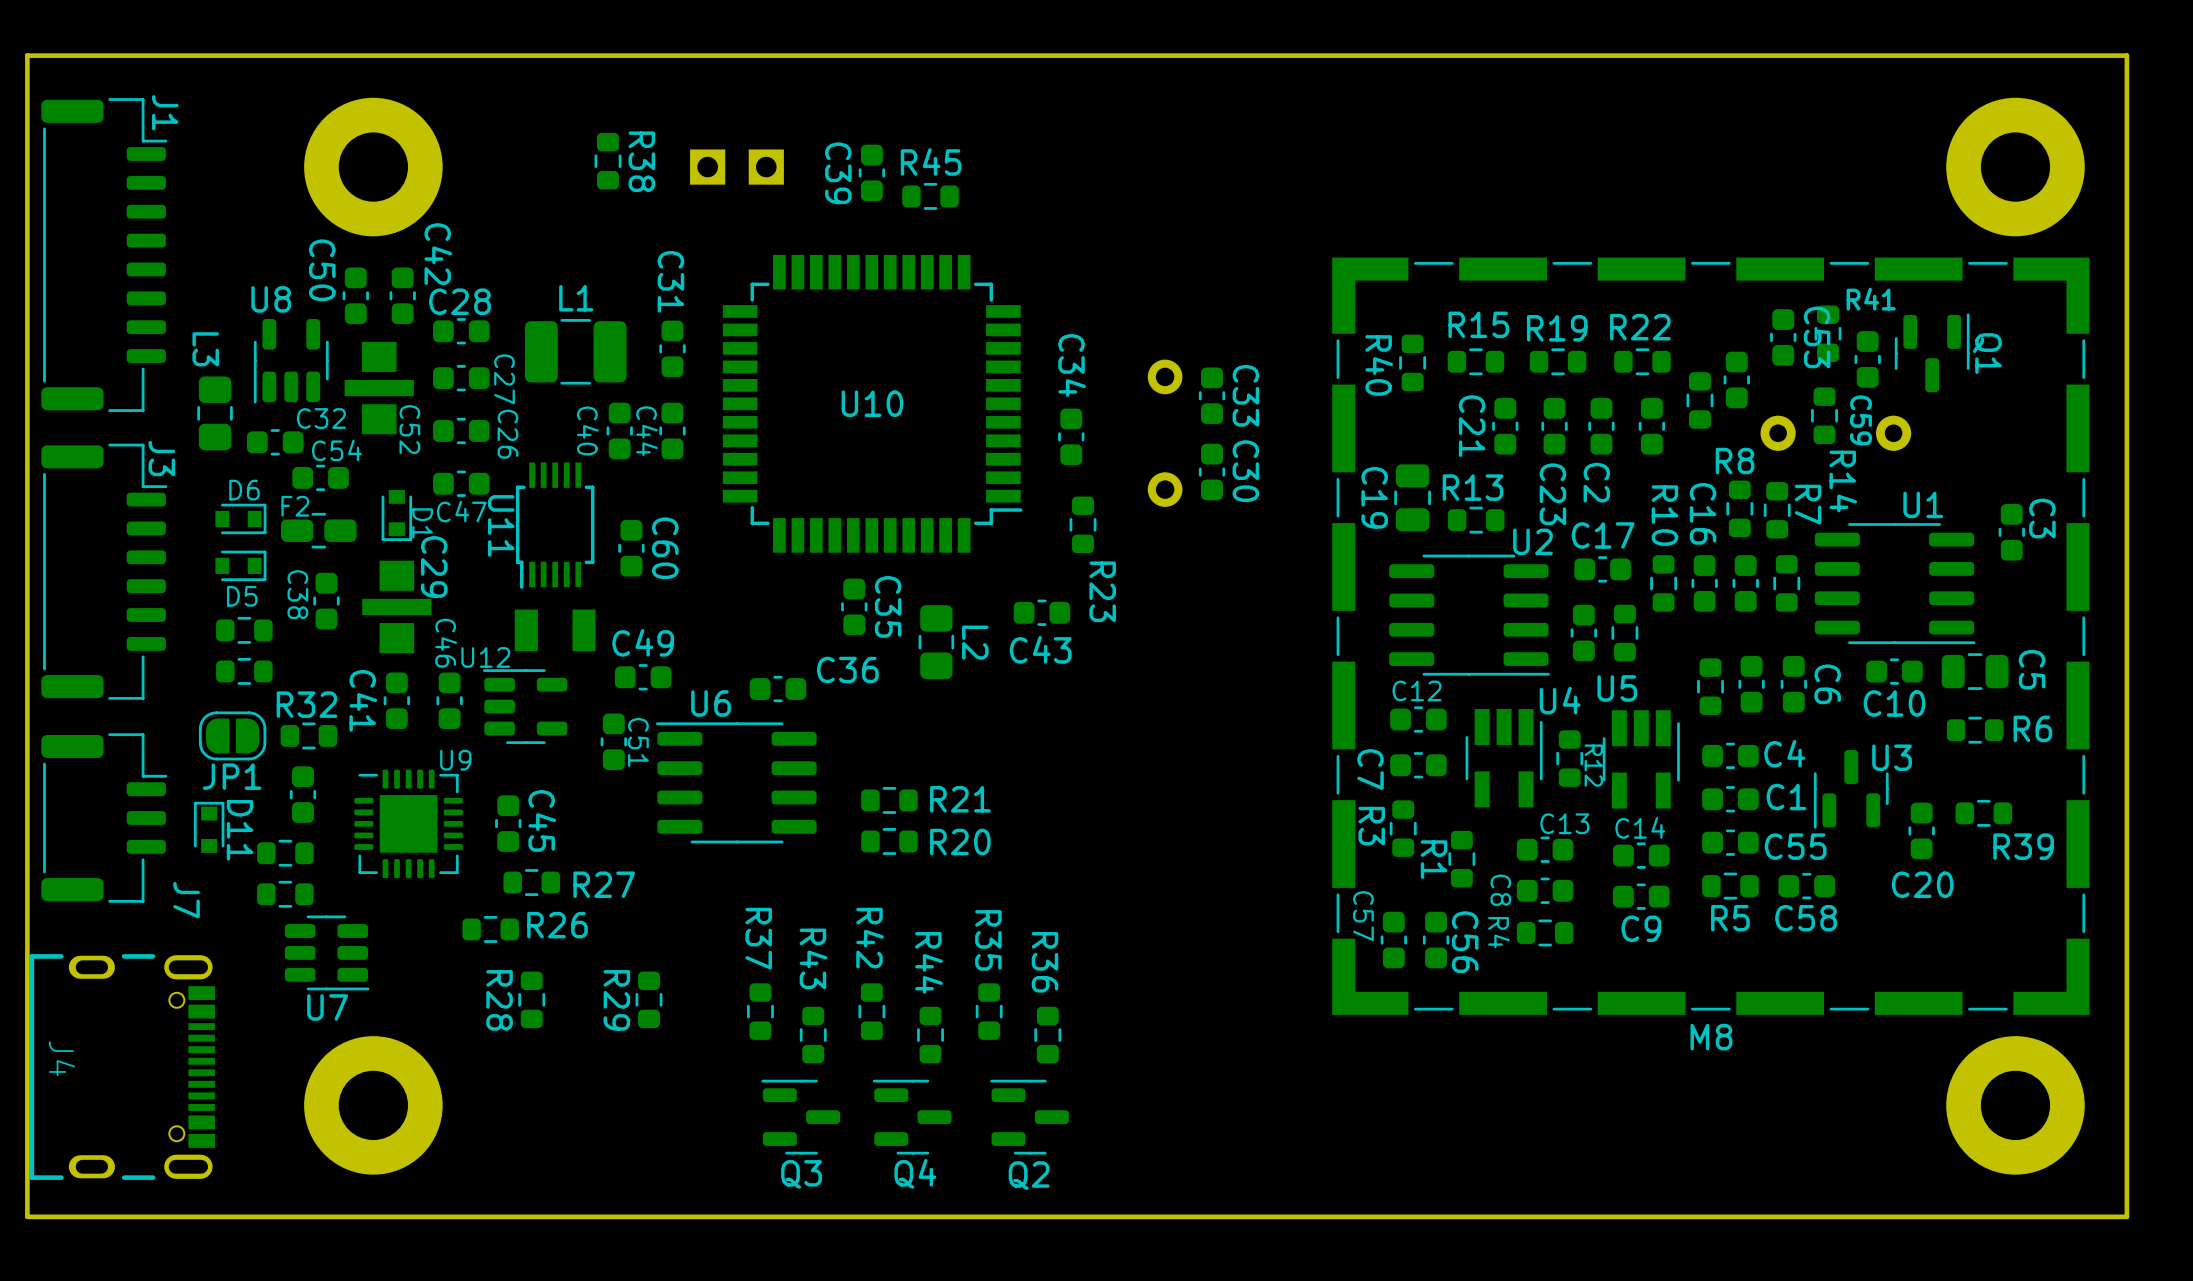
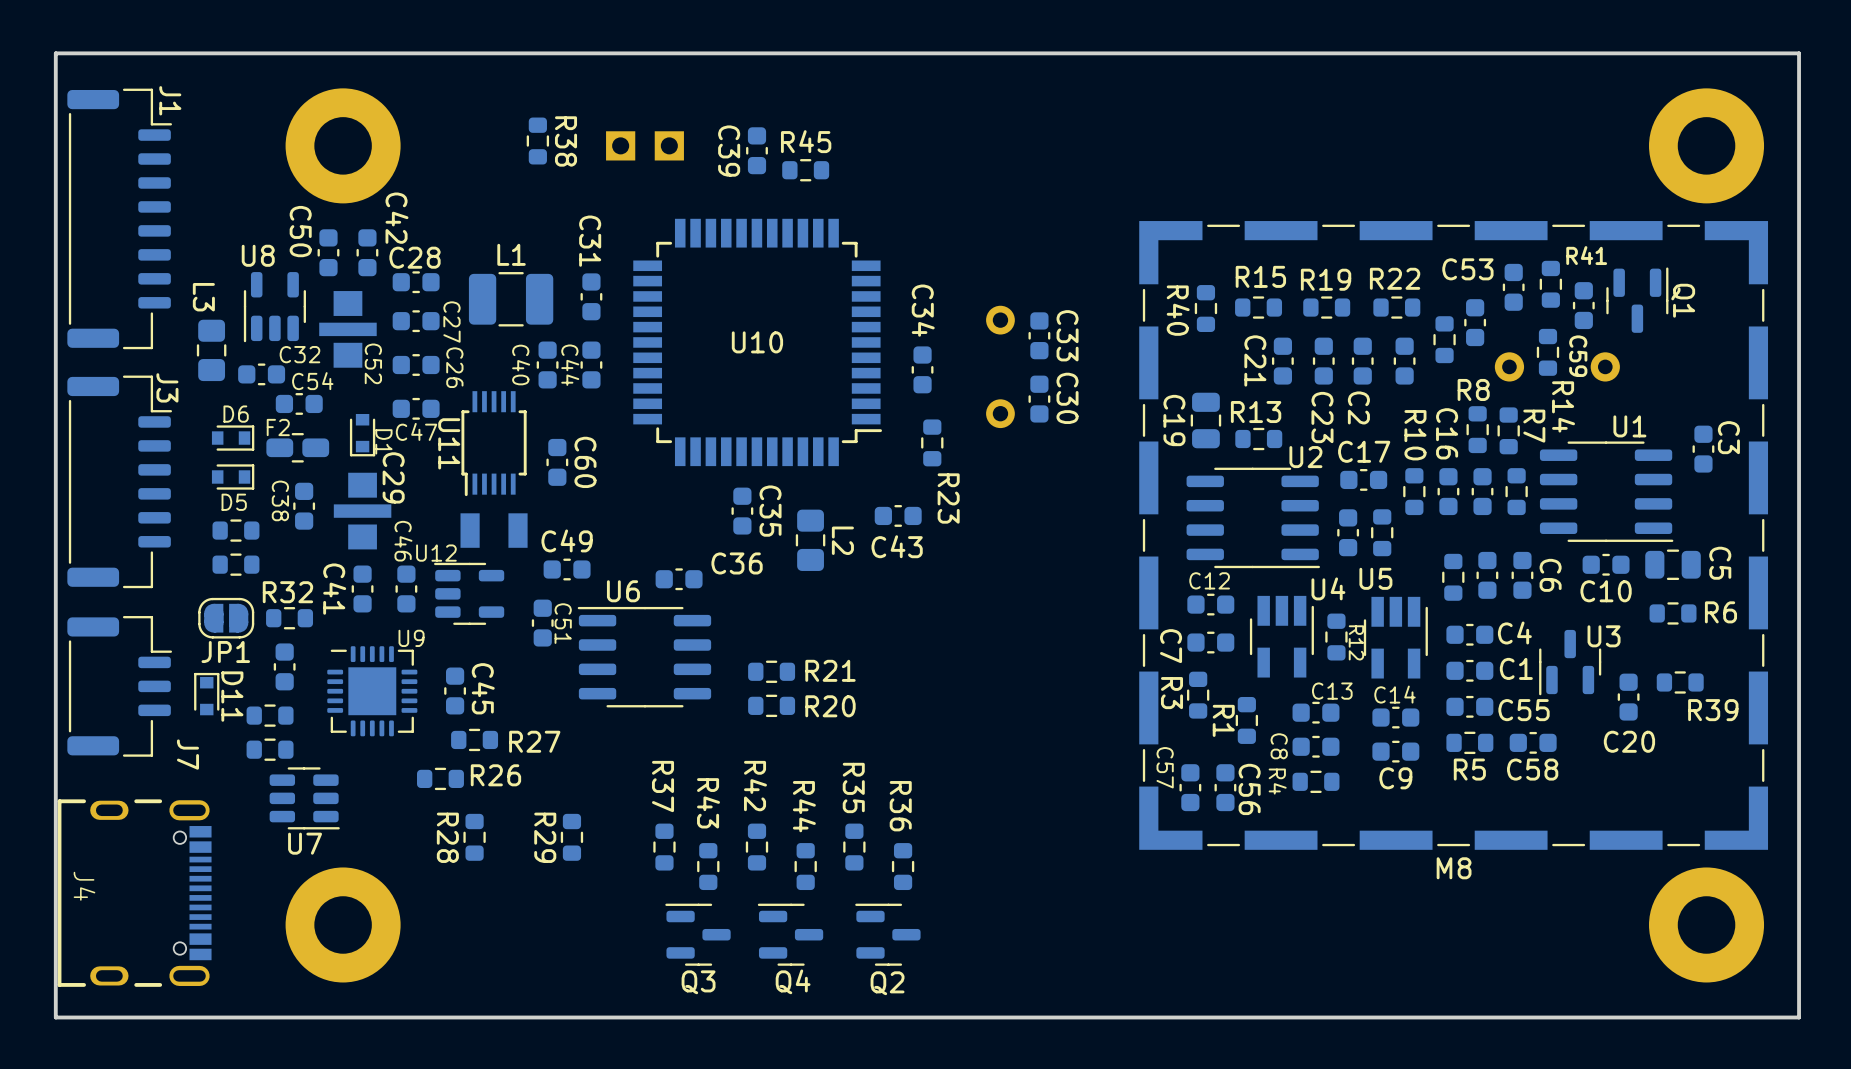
C53 name rotation: 0° (1817, 337) -> 90° counterclockwise (1467, 269)
C53 name position: C53 (1817, 337) -> C53 (1467, 269)

